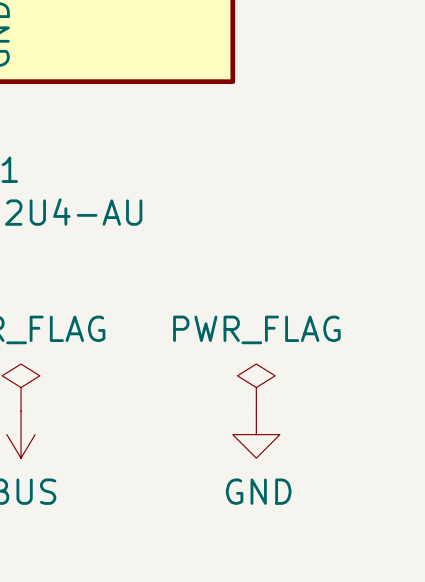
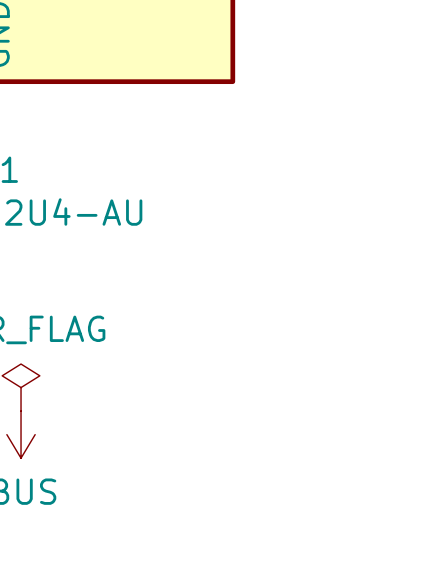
power symbol: PWR_FLAG (256, 387) -> none
power symbol: GND (256, 434) -> none

